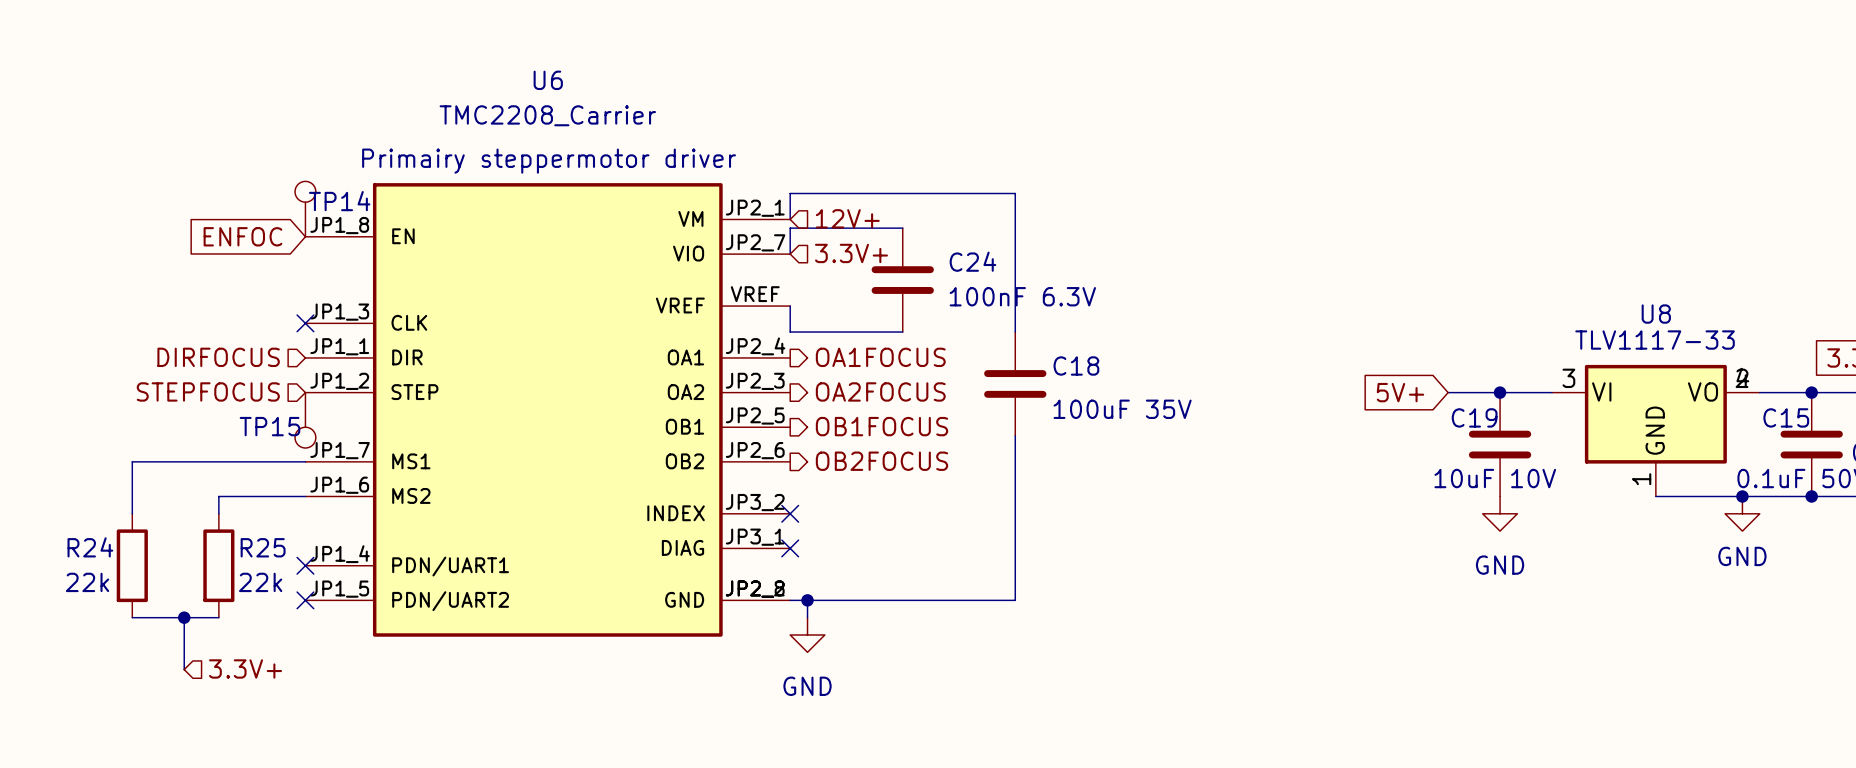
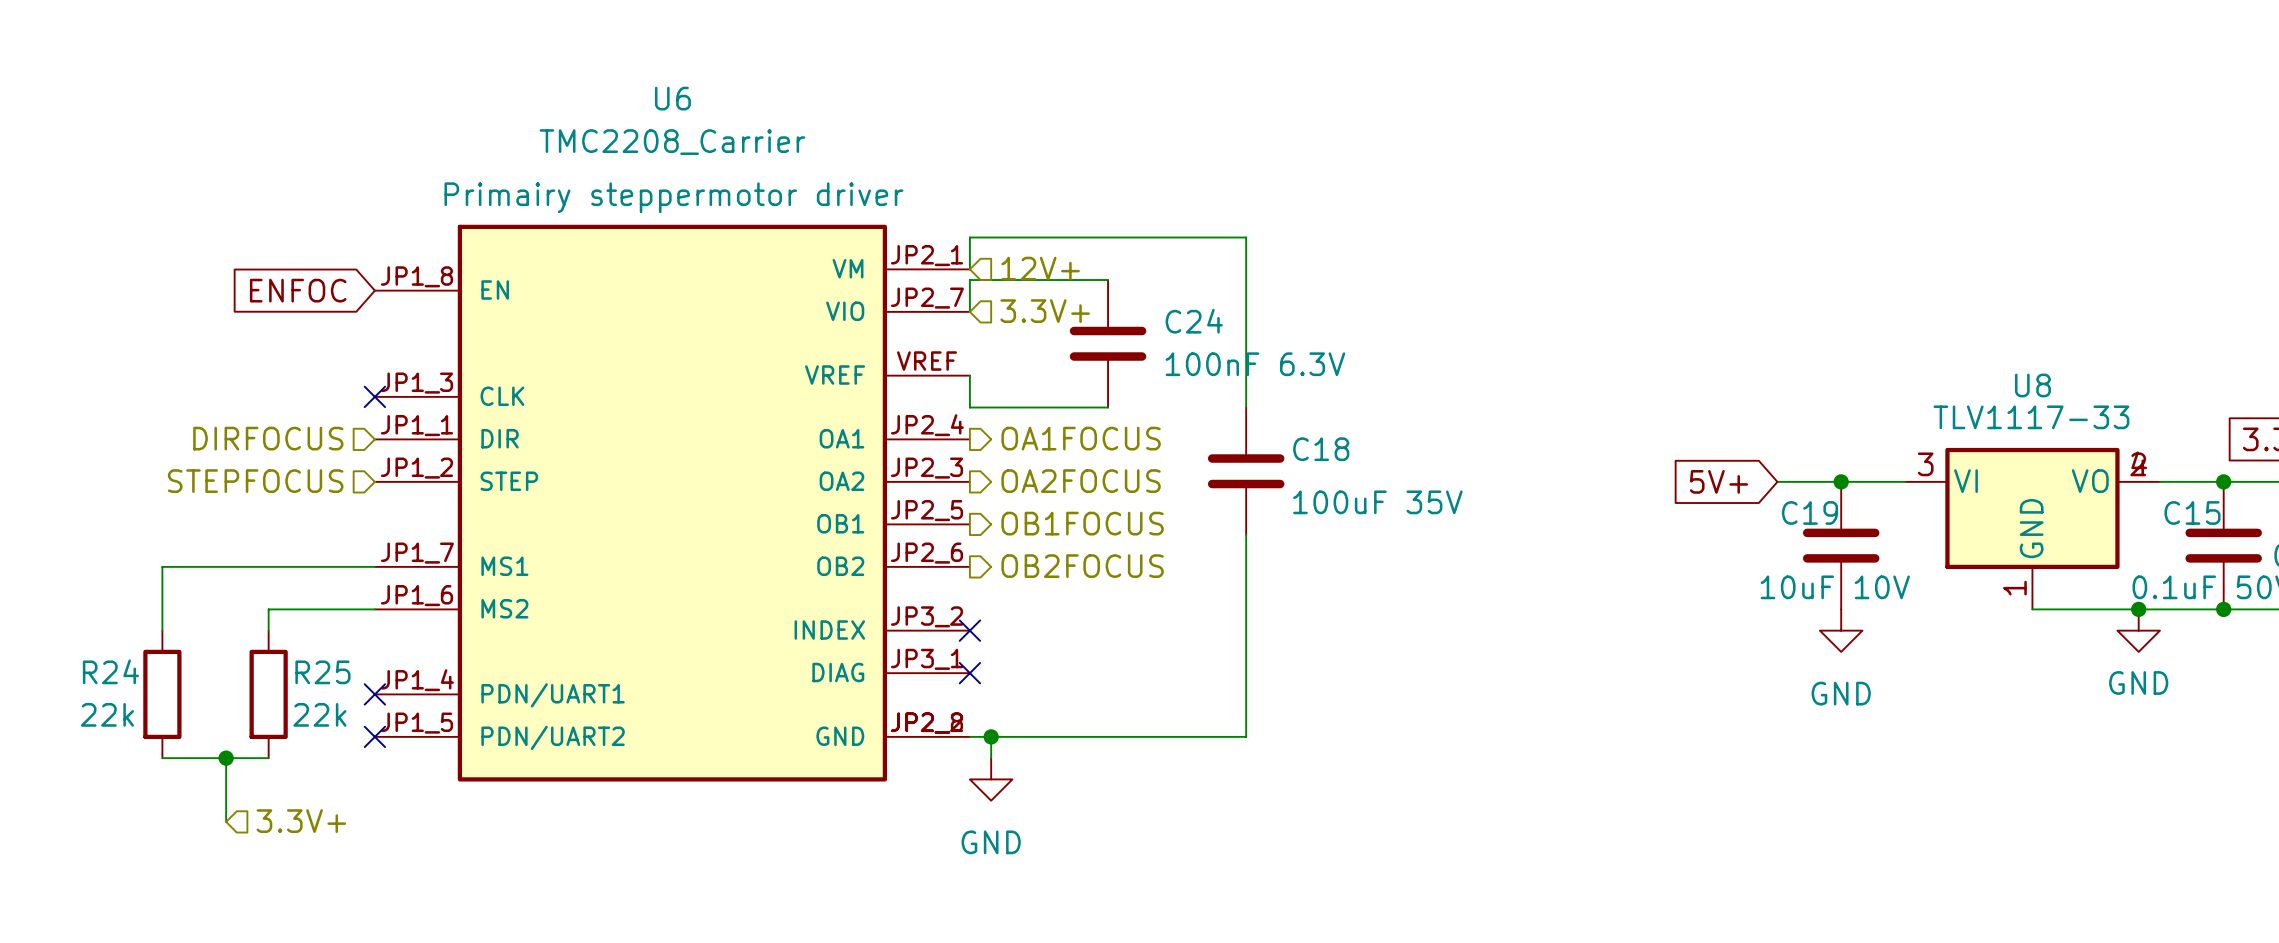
TP14: (305, 209) -> none
TP15: (305, 420) -> none

